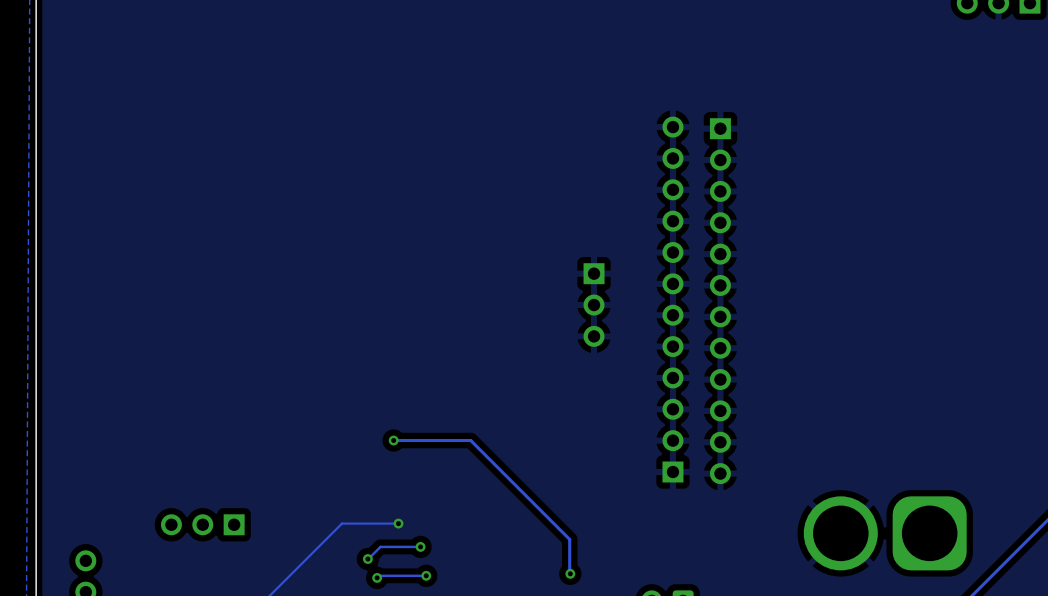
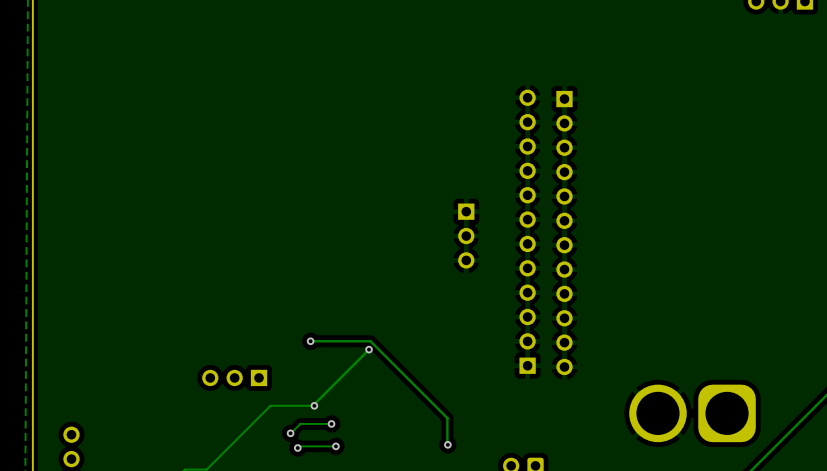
track: none -> (369, 349) (314, 404)
via: none -> (369, 349)
part position: (202, 524) -> (234, 377)

